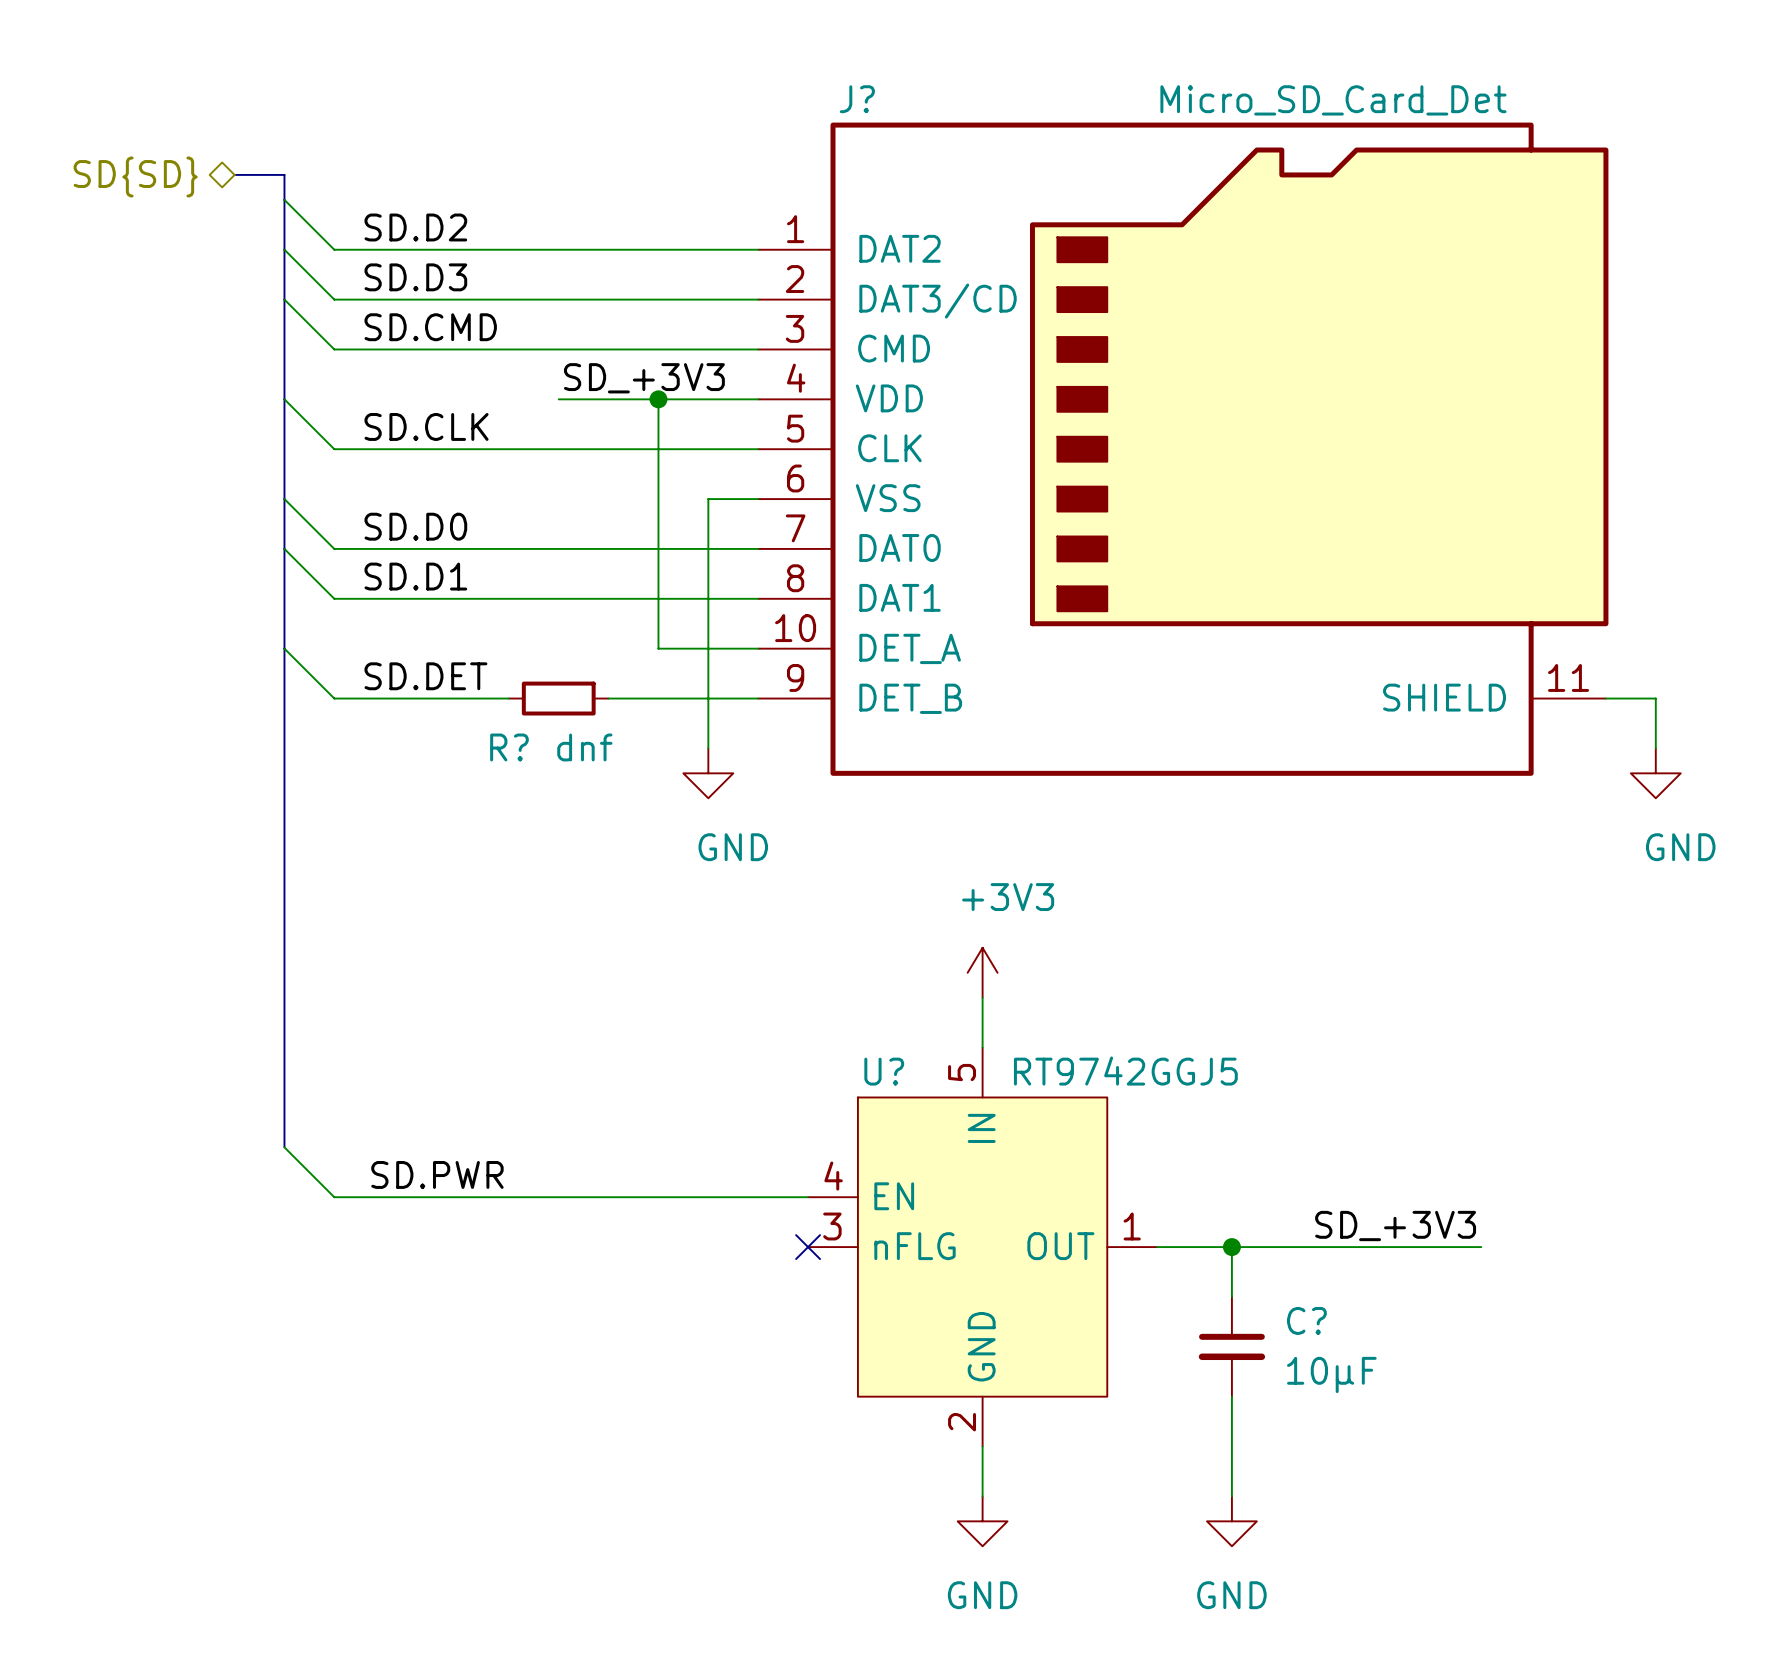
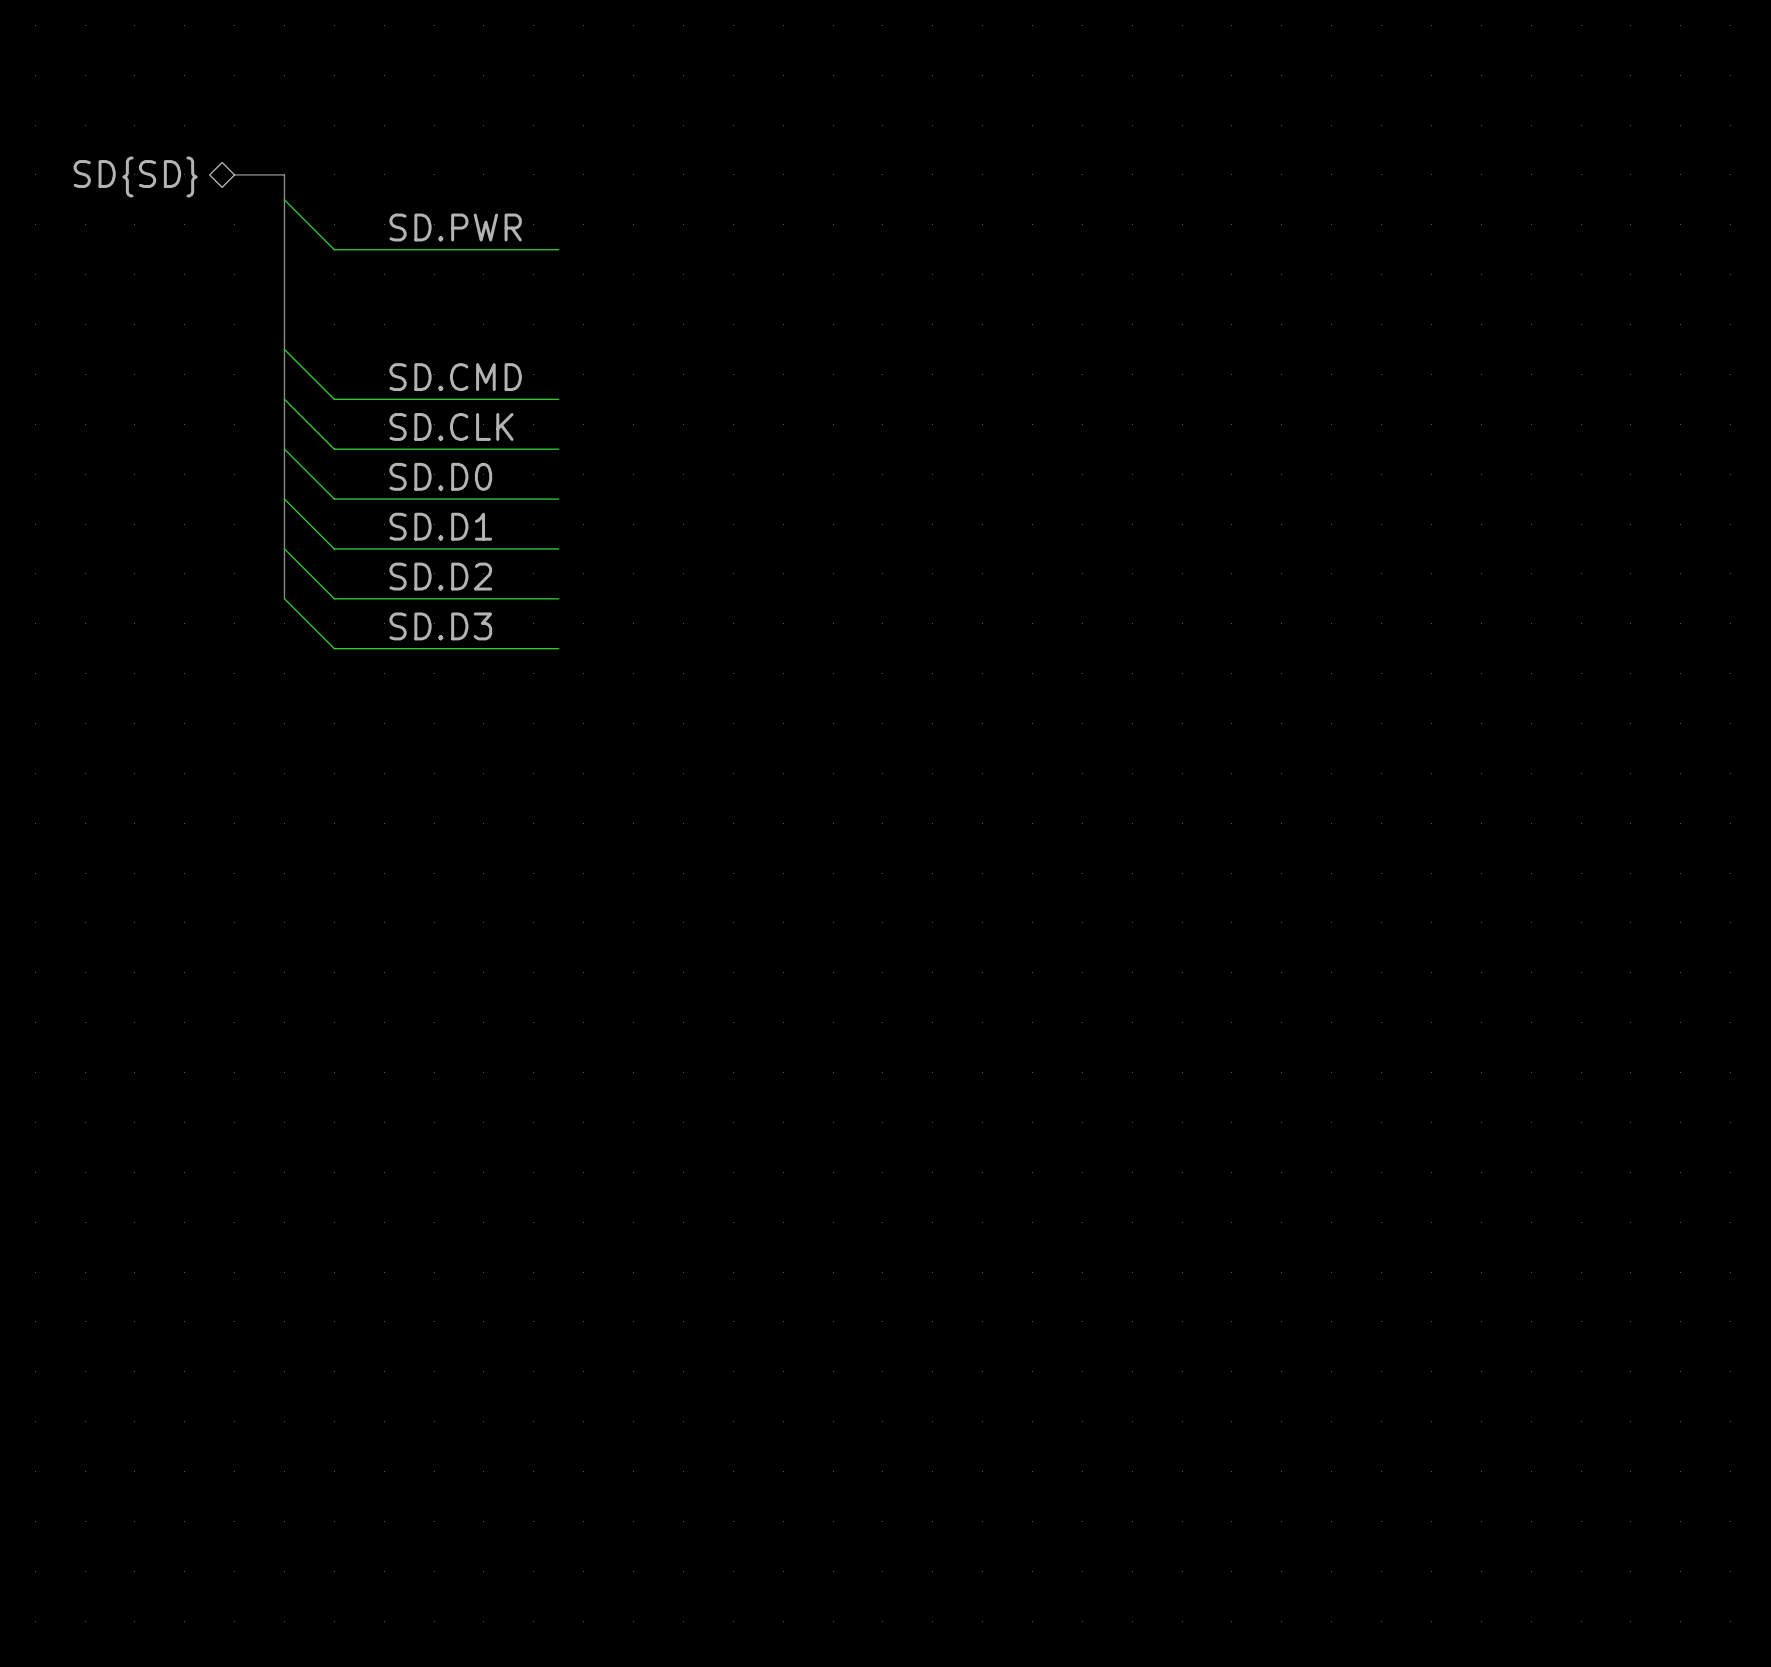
label position: SD.D2 (415, 227) -> SD.D2 (440, 576)
label: none -> SD.PWR (455, 227)
wire: (284, 249) (334, 299) (758, 299) -> none
wire: (558, 249) (758, 249) -> none
label position: SD.D3 (415, 277) -> SD.D3 (440, 626)
wire: (284, 299) (334, 349) (758, 349) -> none
label position: SD.CMD (430, 327) -> SD.CMD (455, 377)
label: SD_+3V3 (644, 378) -> none
wire: (558, 399) (758, 399) -> (558, 399) (334, 399) (284, 349)
wire: (658, 399) (658, 648) (758, 648) -> none
junction: (658, 399) -> none
label position: SD.CLK (426, 426) -> SD.CLK (451, 426)
wire: none -> (284, 449) (334, 499) (558, 499)
wire: (558, 449) (758, 449) -> none
J?: Micro_SD_Card_Det (1183, 449) -> none
wire: (758, 499) (708, 499) (708, 748) -> none
label position: SD.D0 (415, 526) -> SD.D0 (440, 476)
wire: (558, 548) (758, 548) -> none
label position: SD.D1 (415, 576) -> SD.D1 (440, 526)
wire: none -> (284, 598) (334, 648) (558, 648)
bus: (284, 598) (284, 1147) -> none
wire: (558, 598) (758, 598) -> none
wire: (284, 648) (334, 698) (508, 698) -> none
label: SD.DET (425, 676) -> none
R?: dnf (558, 698) -> none
wire: (608, 698) (758, 698) -> none
wire: (1605, 698) (1655, 698) (1655, 748) -> none
power symbol: GND (708, 773) -> none
power symbol: GND (1655, 773) -> none
power symbol: +3V3 (982, 972) -> none
wire: (982, 997) (982, 1047) -> none
wire: (284, 1147) (334, 1197) (808, 1197) -> none
label: SD.PWR (437, 1174) -> none
label: SD_+3V3 (1395, 1226) -> none
no-connect mark: (808, 1247) -> none
U?: RT9742GGJ5 (982, 1247) -> none
wire: (1157, 1247) (1481, 1247) -> none
wire: (1231, 1247) (1231, 1296) -> none
junction: (1231, 1247) -> none
C?: 10μF (1231, 1346) -> none
wire: (1231, 1396) (1231, 1496) -> none
wire: (982, 1446) (982, 1496) -> none
power symbol: GND (982, 1521) -> none
power symbol: GND (1231, 1521) -> none

